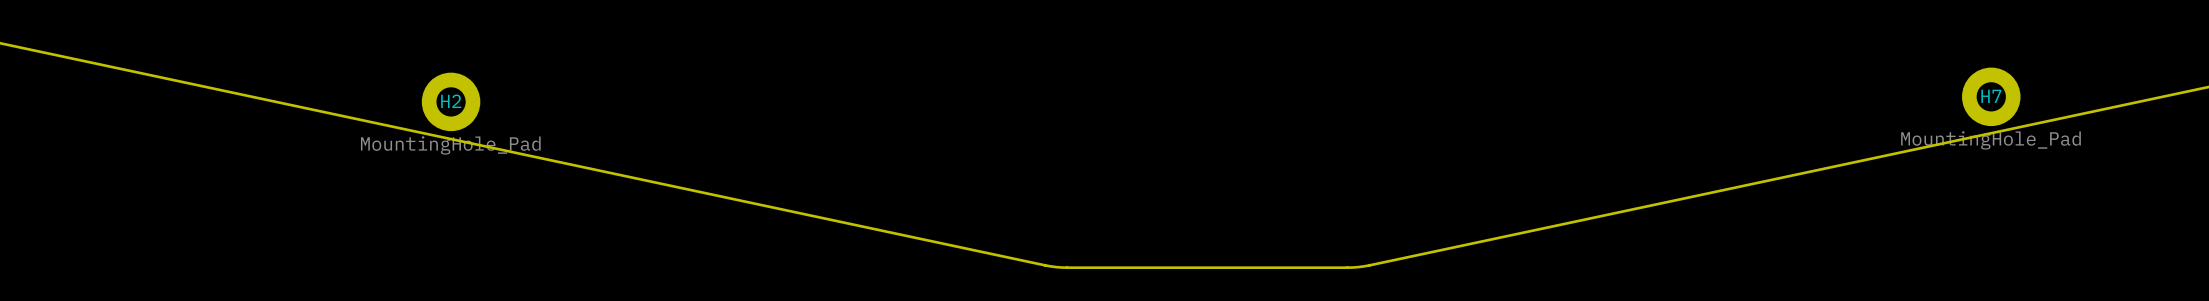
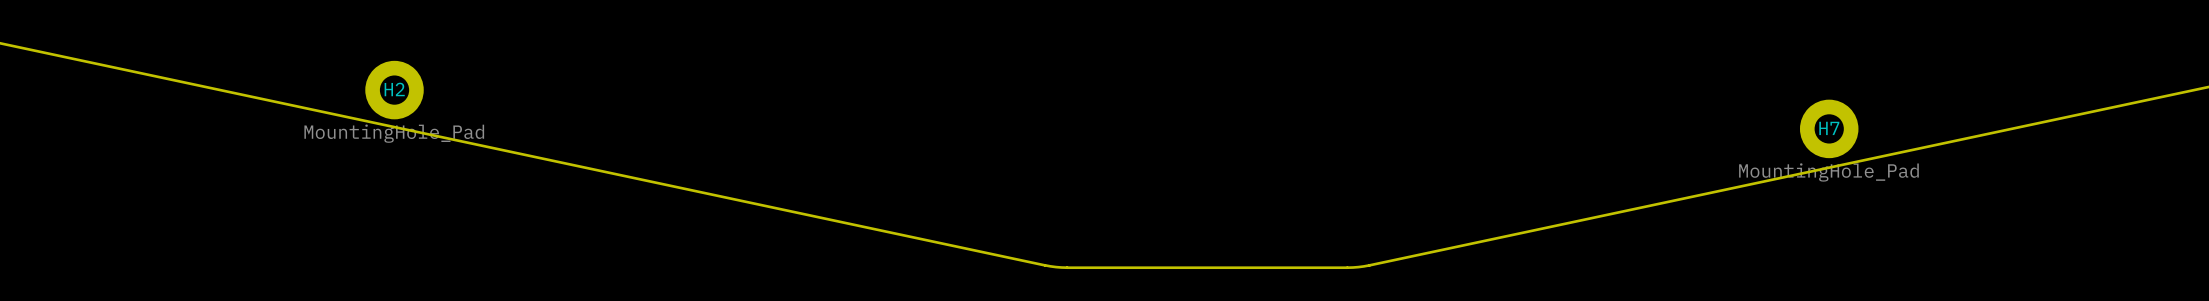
H7 position: (1991, 96) -> (1829, 128)
H2 position: (451, 101) -> (394, 90)

